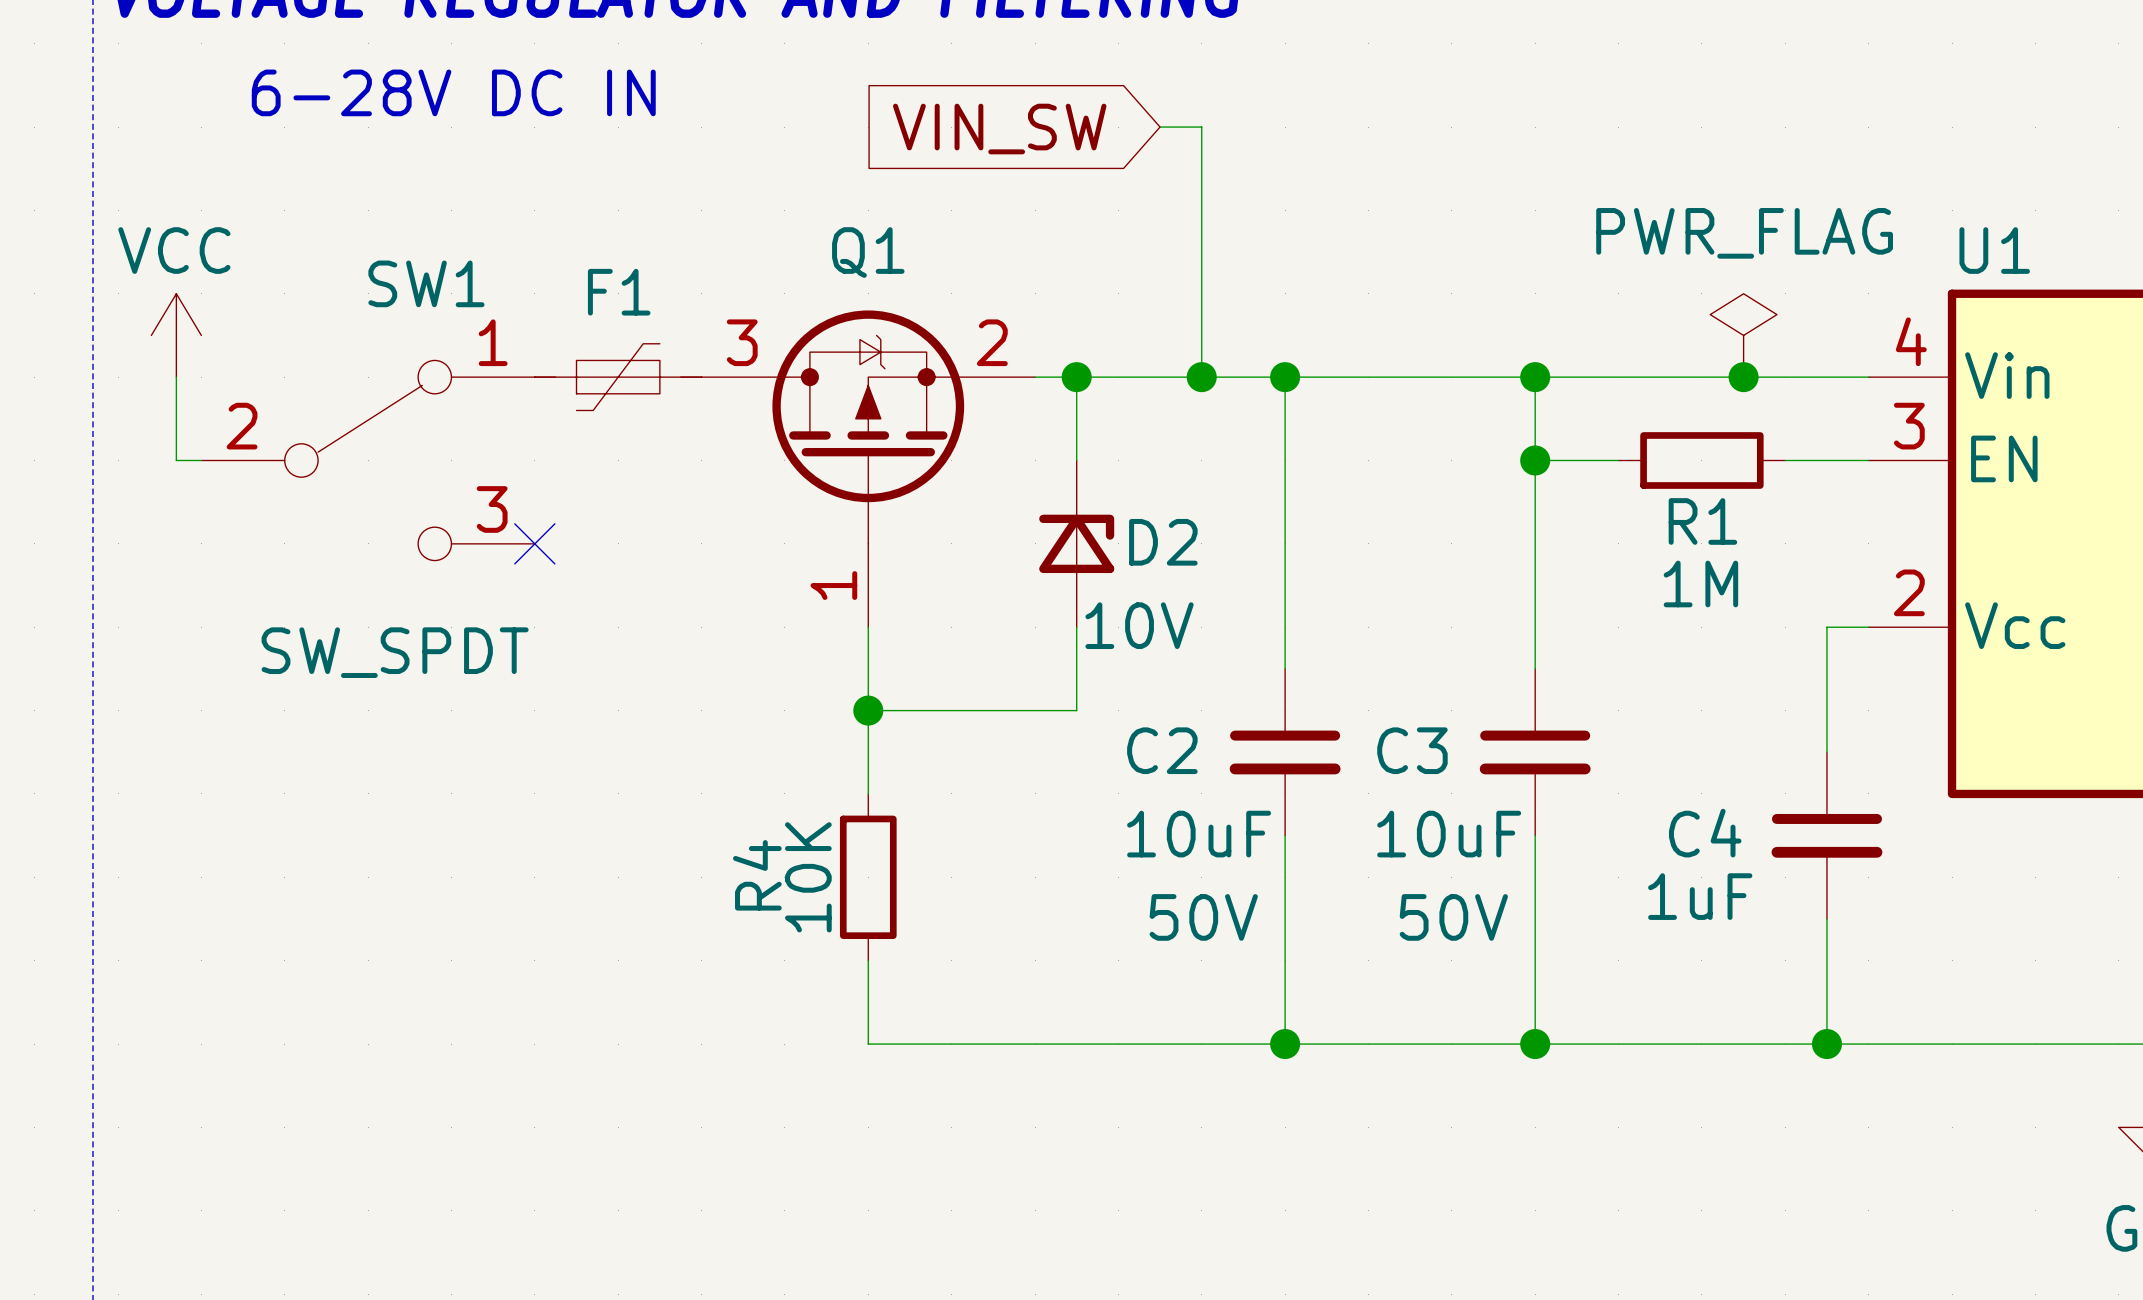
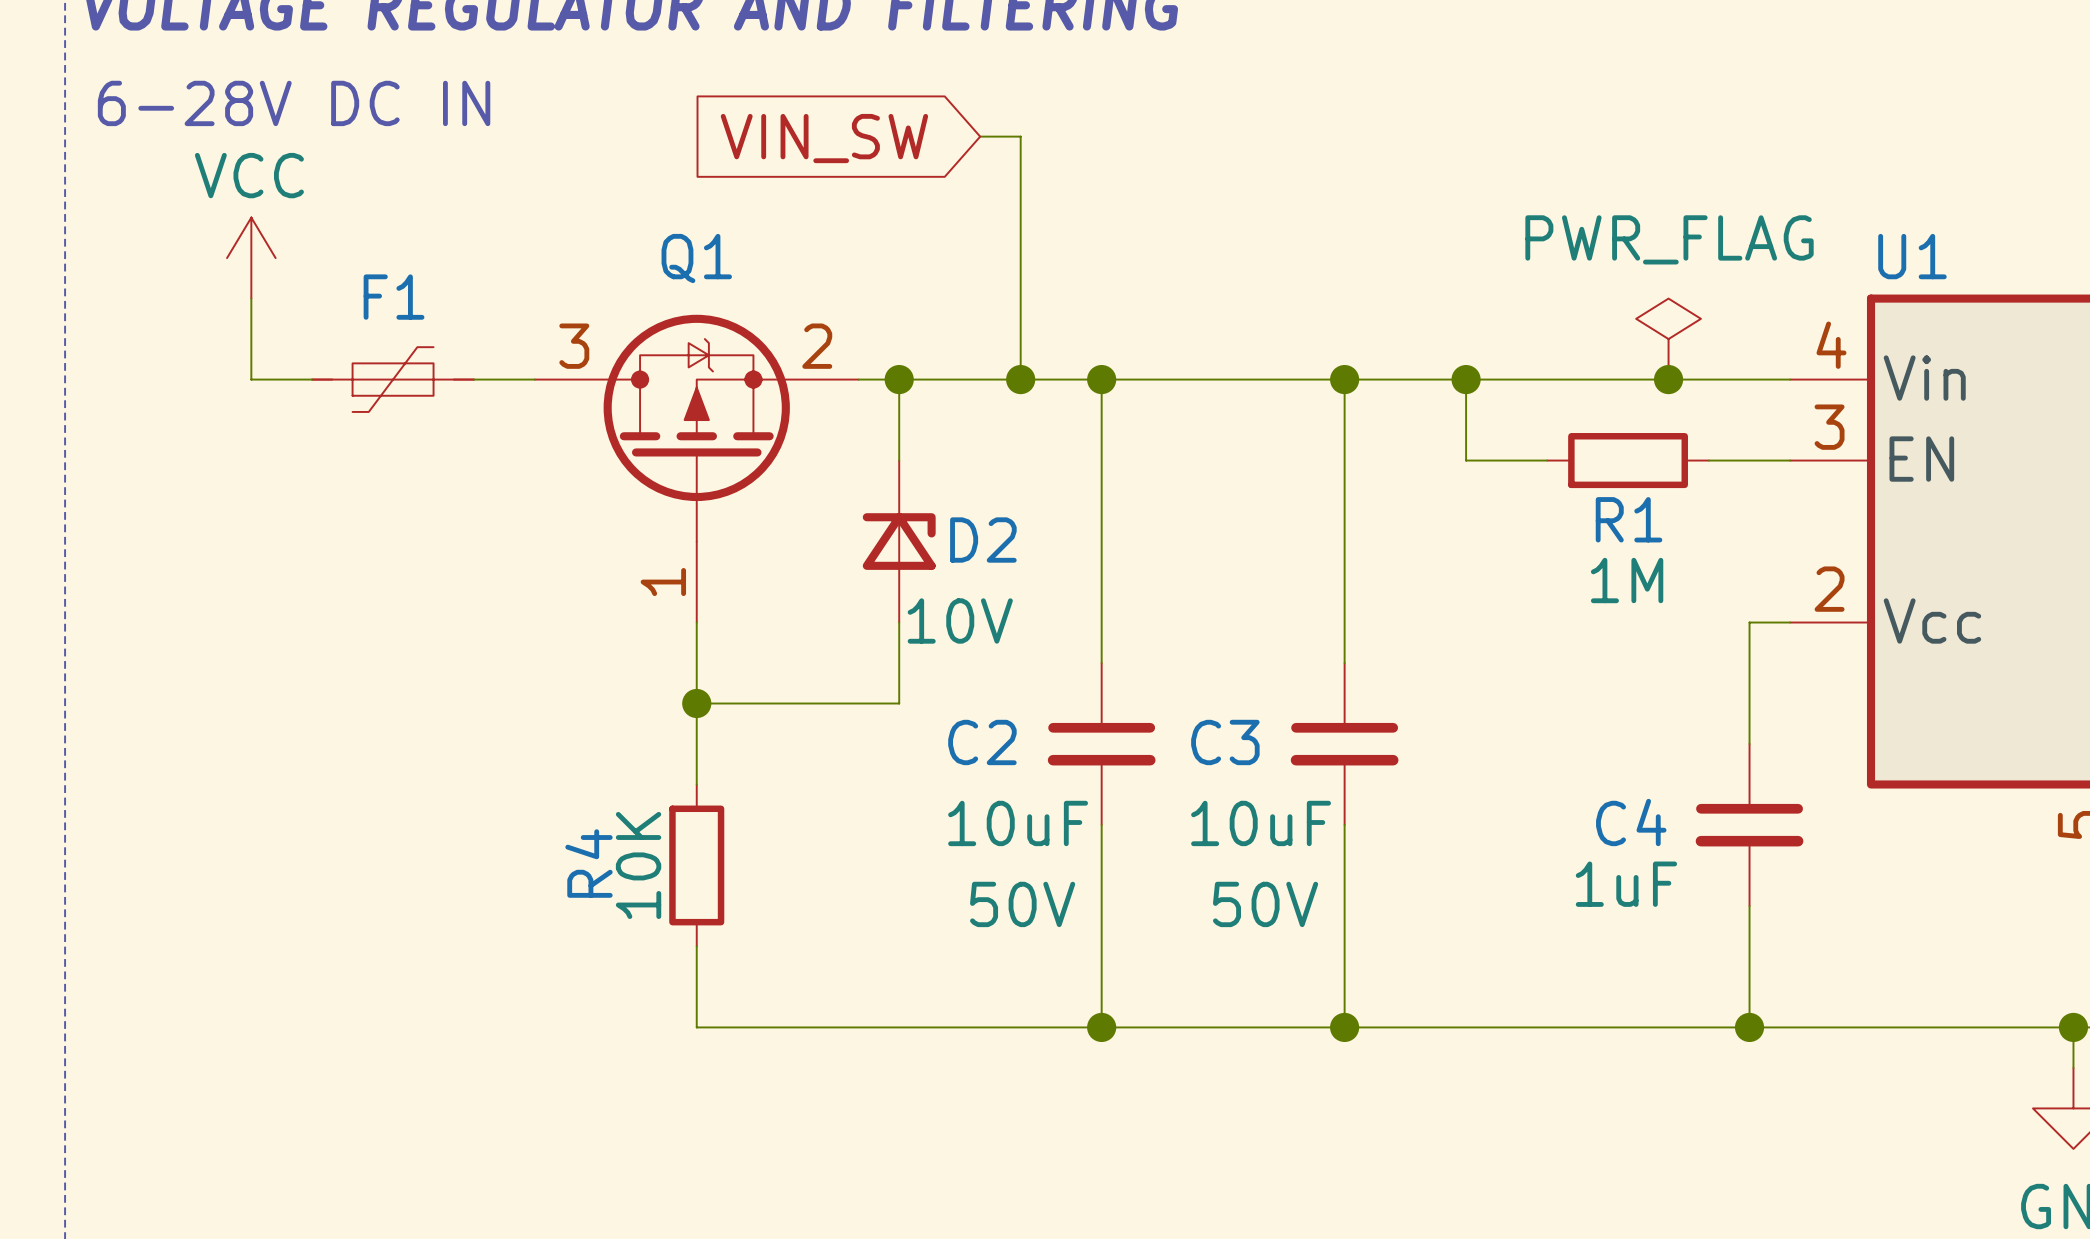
text position: 6-28V DC IN (453, 92) -> 6-28V DC IN (294, 103)
wire: (1160, 127) (1201, 127) (1201, 377) -> none
global label position: VIN_SW (999, 129) -> VIN_SW (824, 138)
wire: none -> (251, 298) (251, 379) (312, 379)
power symbol position: VCC (176, 335) -> VCC (251, 258)
wire: (176, 377) (176, 460) (201, 460) -> none
F1 position: (618, 377) -> (393, 379)
wire: none -> (899, 379) (899, 460)
junction: none -> (899, 379)
wire: (1076, 377) (1076, 460) -> (1020, 379) (1020, 136) (980, 136)
junction position: (1201, 377) -> (1101, 379)
wire: (1285, 377) (1285, 668) -> (1101, 379) (1101, 663)
junction: (1285, 377) -> none
wire: none -> (1344, 379) (1344, 663)
junction: none -> (1344, 379)
SW1: SW_SPDT (368, 460) -> none
wire: (1535, 460) (1535, 668) -> none
junction: (1535, 460) -> none
Q1 position: (868, 468) -> (696, 468)
no-connect mark: (534, 543) -> none
D2 position: (1076, 543) -> (899, 541)
wire: (868, 627) (868, 793) -> (696, 622) (696, 784)
wire: (1076, 627) (1076, 710) (951, 710) -> (899, 622) (899, 703)
wire: none -> (696, 703) (818, 703)
junction position: (868, 710) -> (696, 703)
C2 position: (1285, 752) -> (1101, 743)
C3 position: (1535, 752) -> (1344, 743)
wire: (1285, 835) (1285, 1044) -> (1101, 824) (1101, 1027)
wire: (1535, 835) (1535, 1044) -> (1344, 824) (1344, 1027)
R4 position: (868, 877) -> (696, 865)
wire: (868, 960) (868, 1044) -> (696, 946) (696, 1027) (818, 1027)
junction: none -> (1101, 1027)
junction: (1285, 1044) -> none
junction: none -> (1344, 1027)
junction: (1535, 1044) -> none

